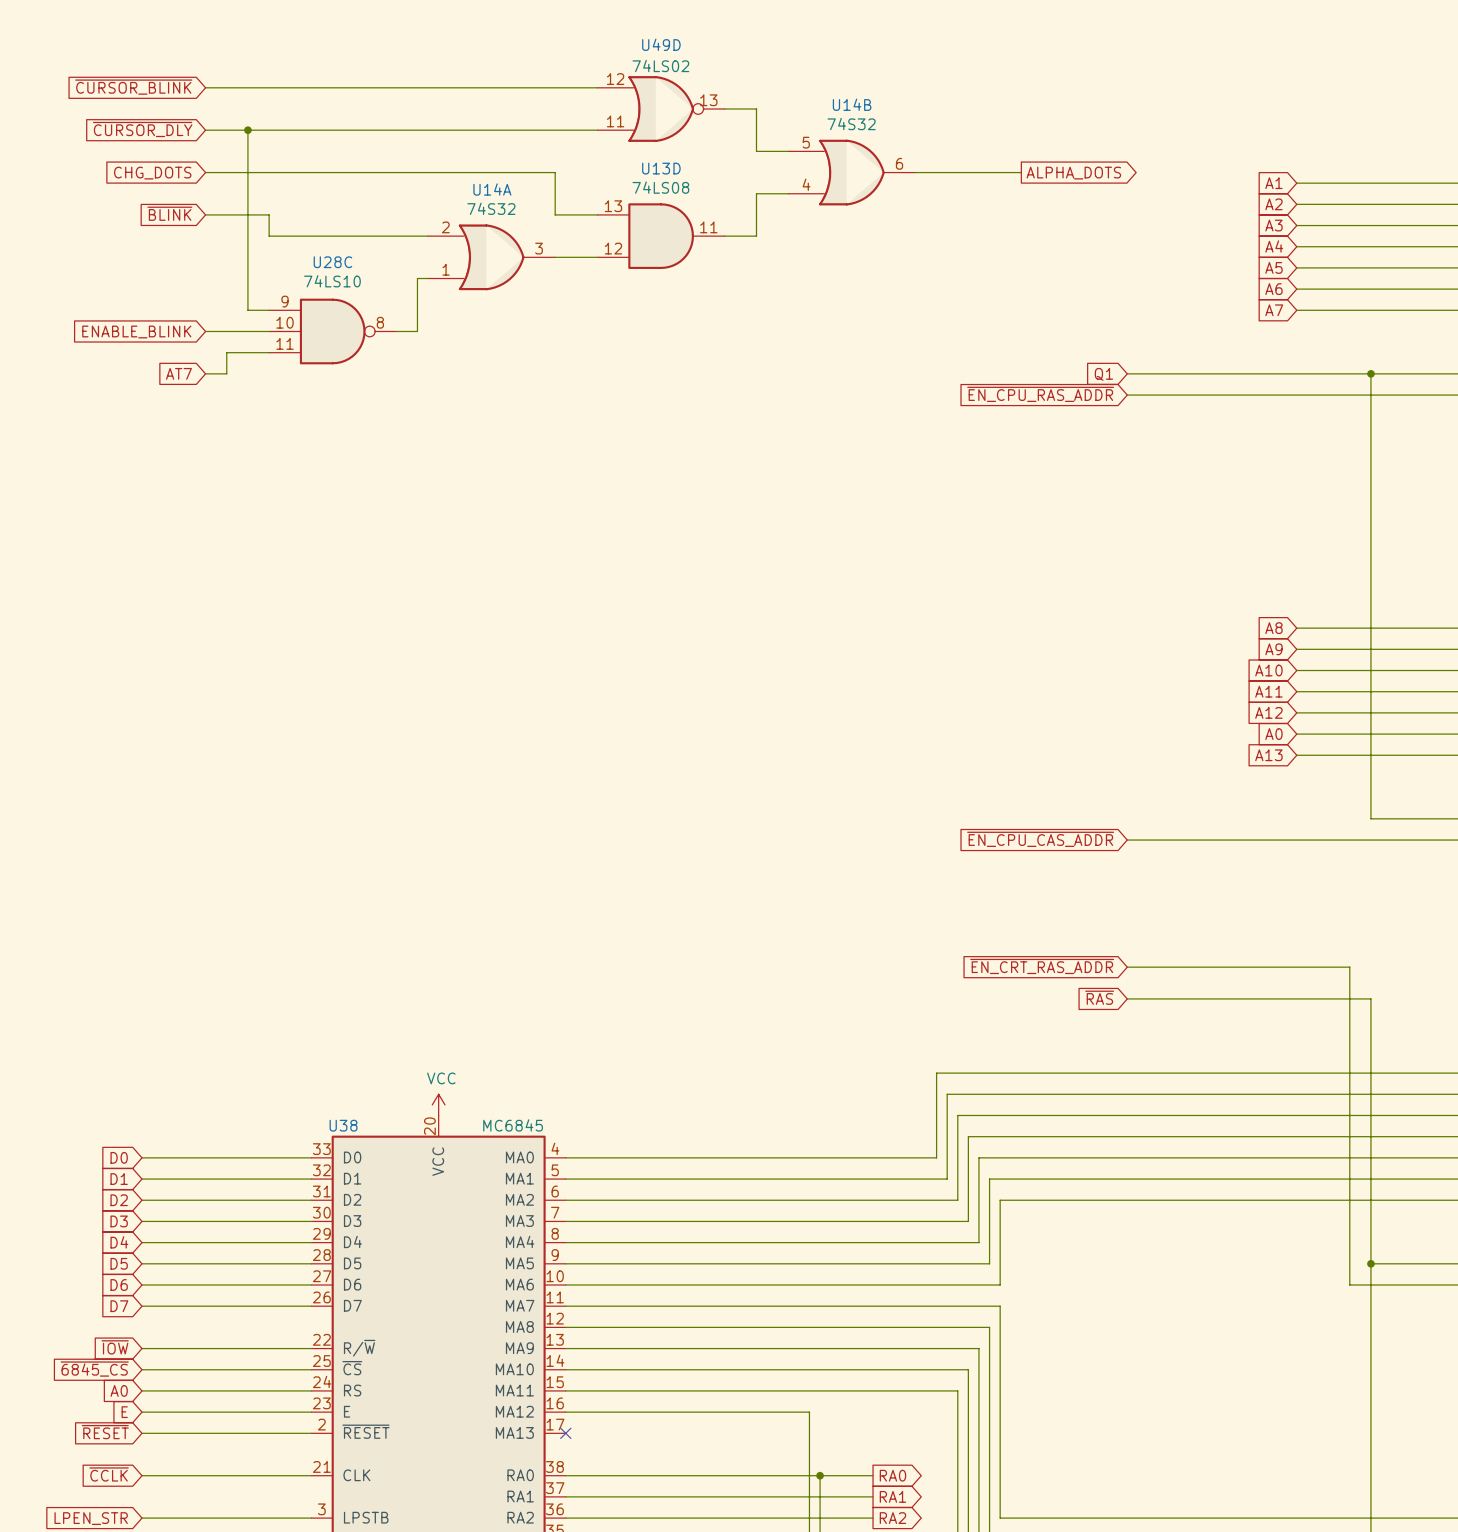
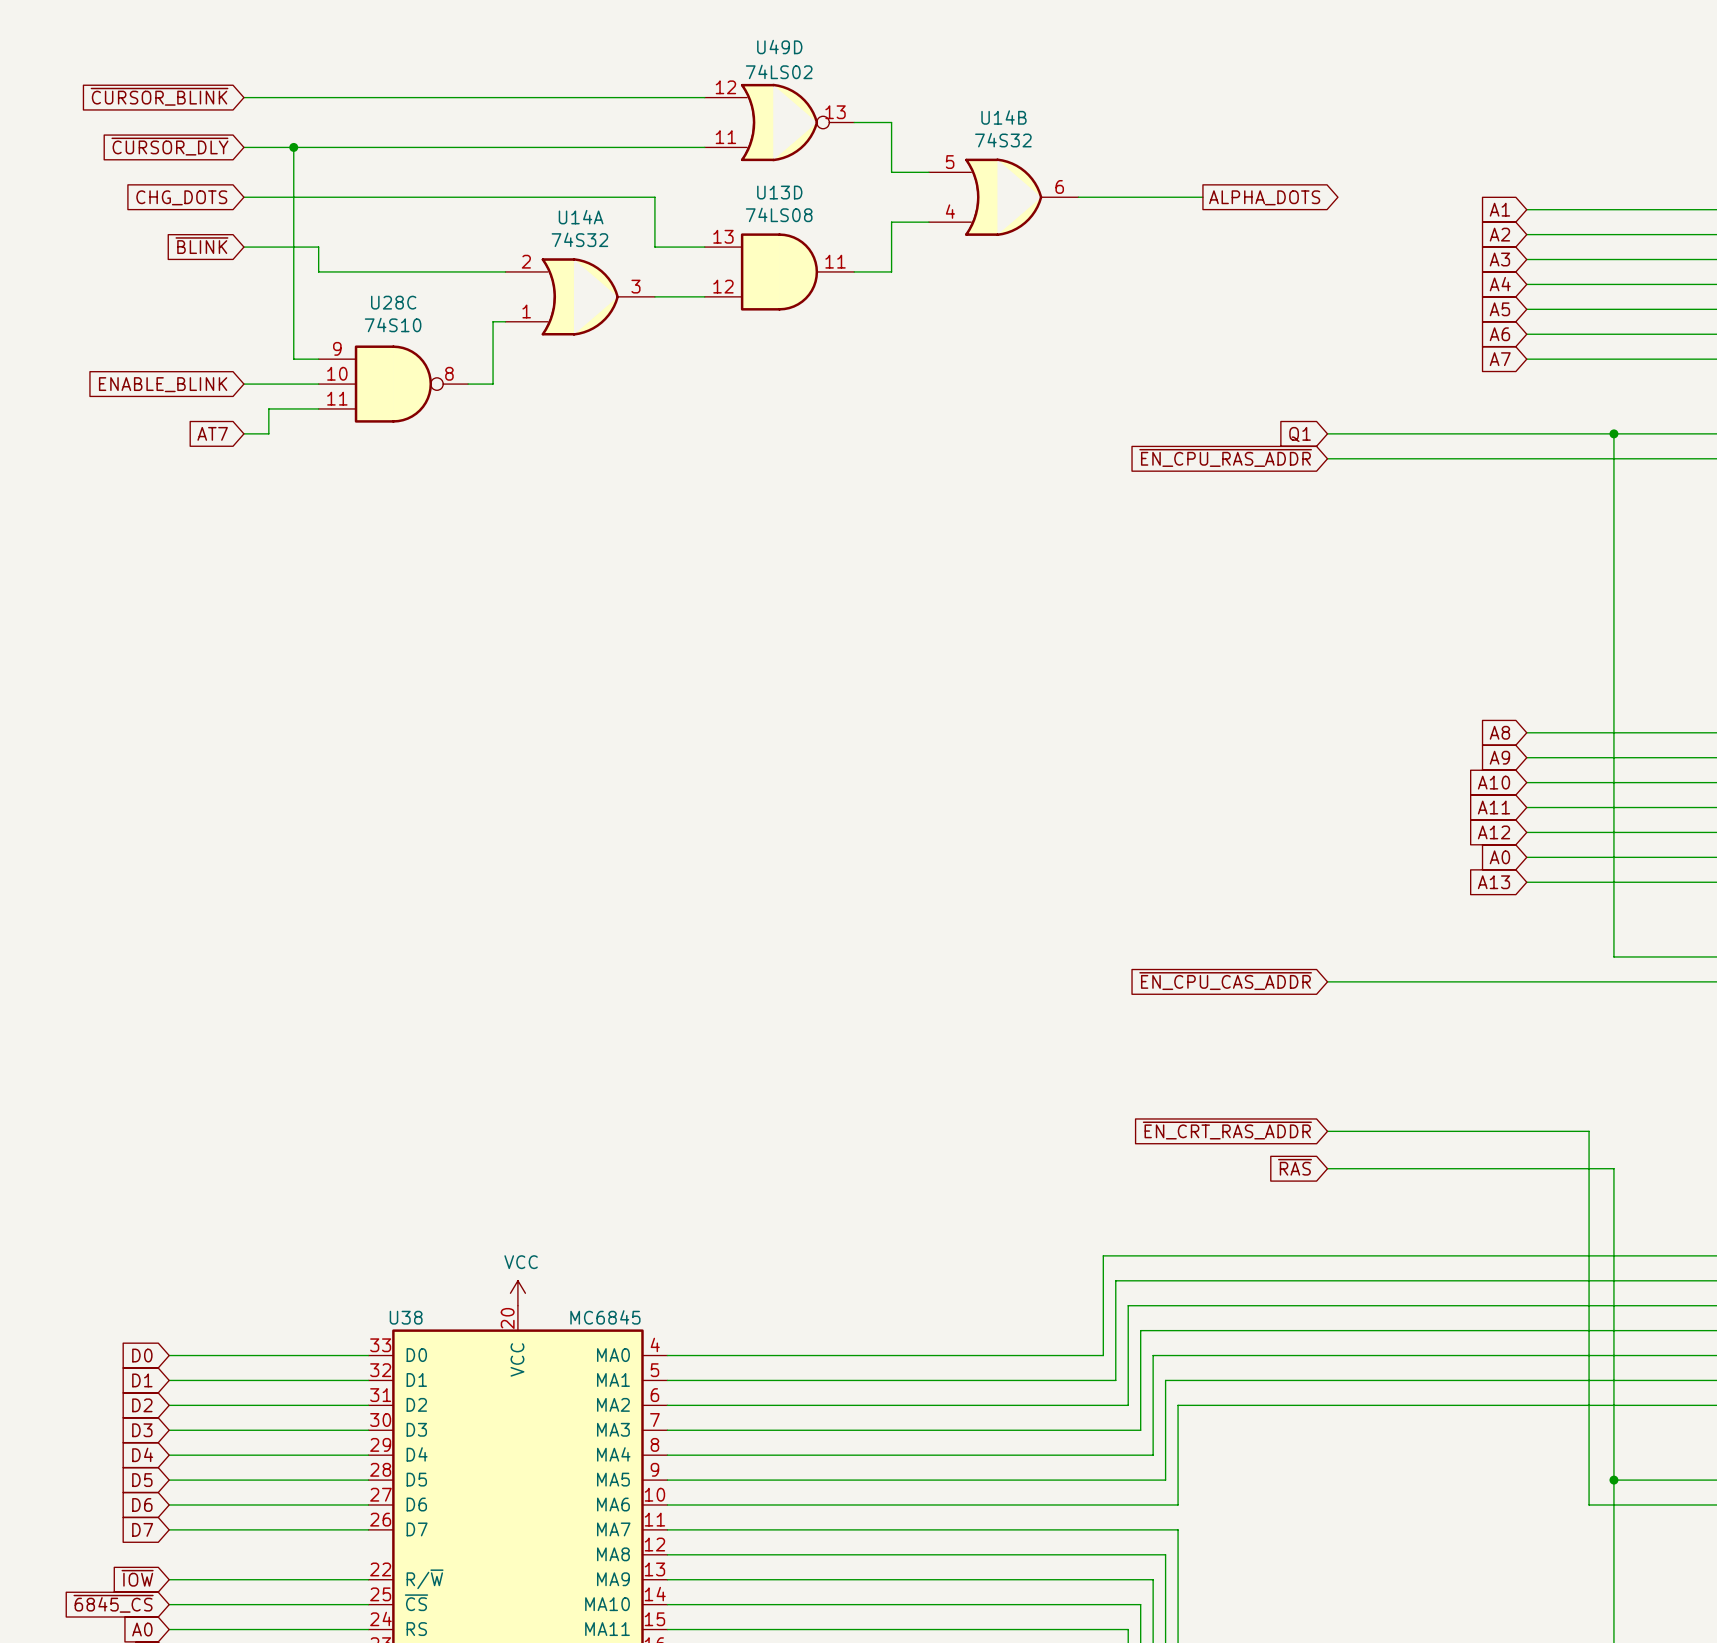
U28C value: 74LS10 (332, 281) -> 74S10 (393, 325)

